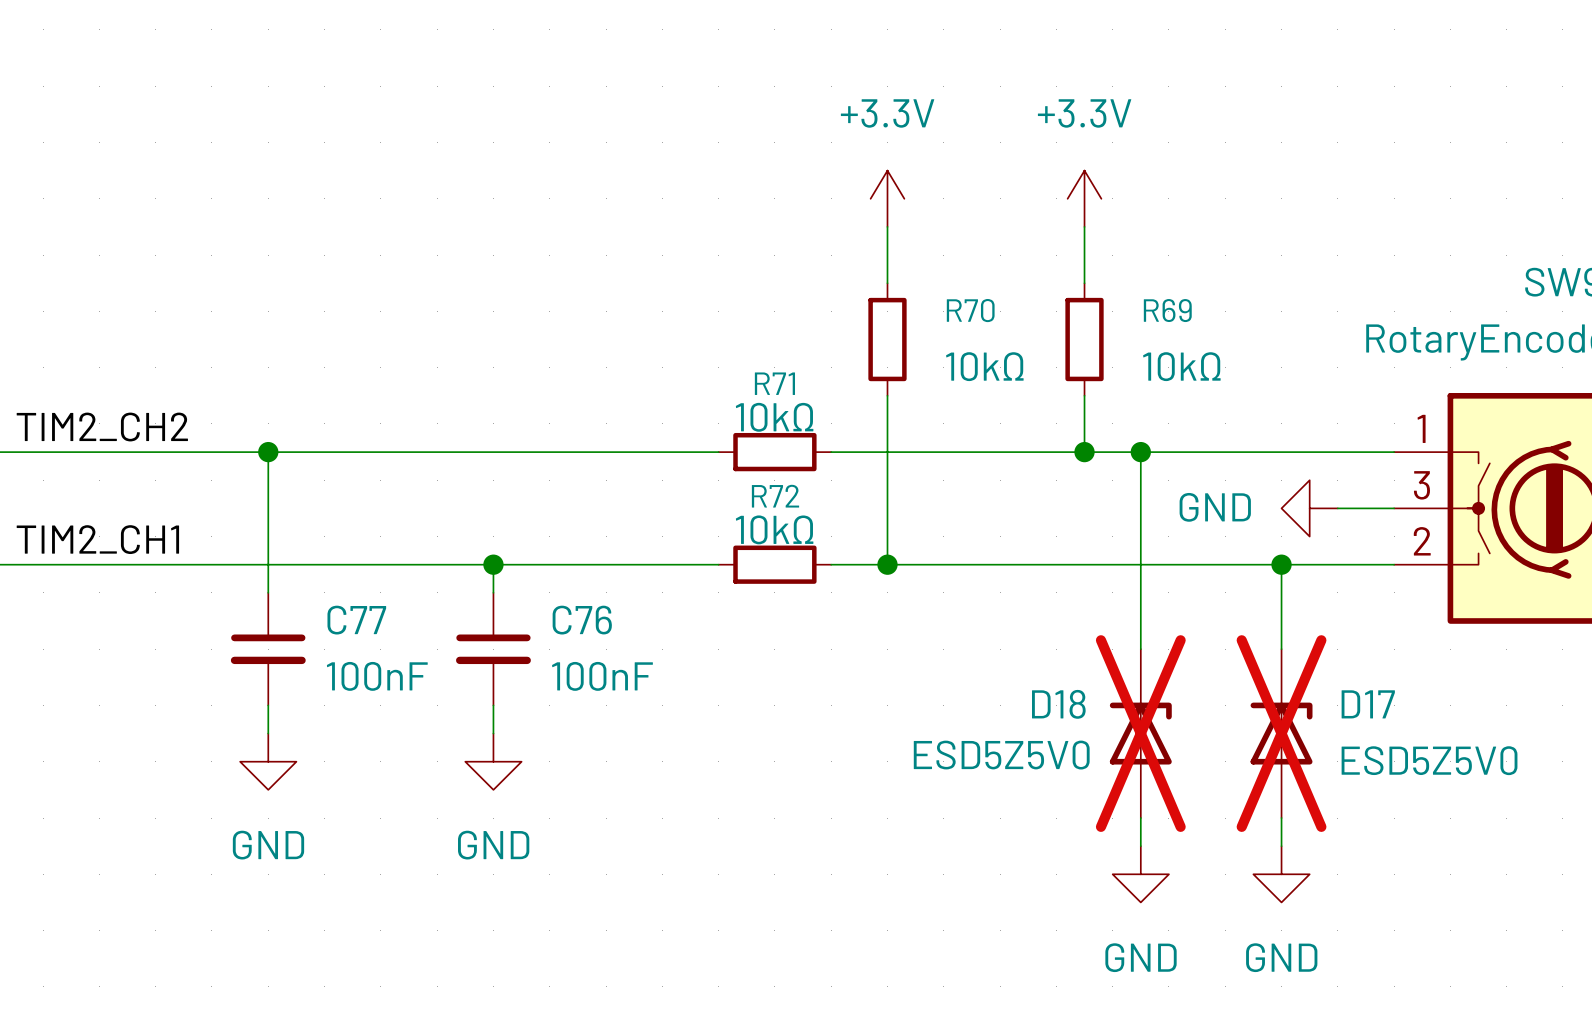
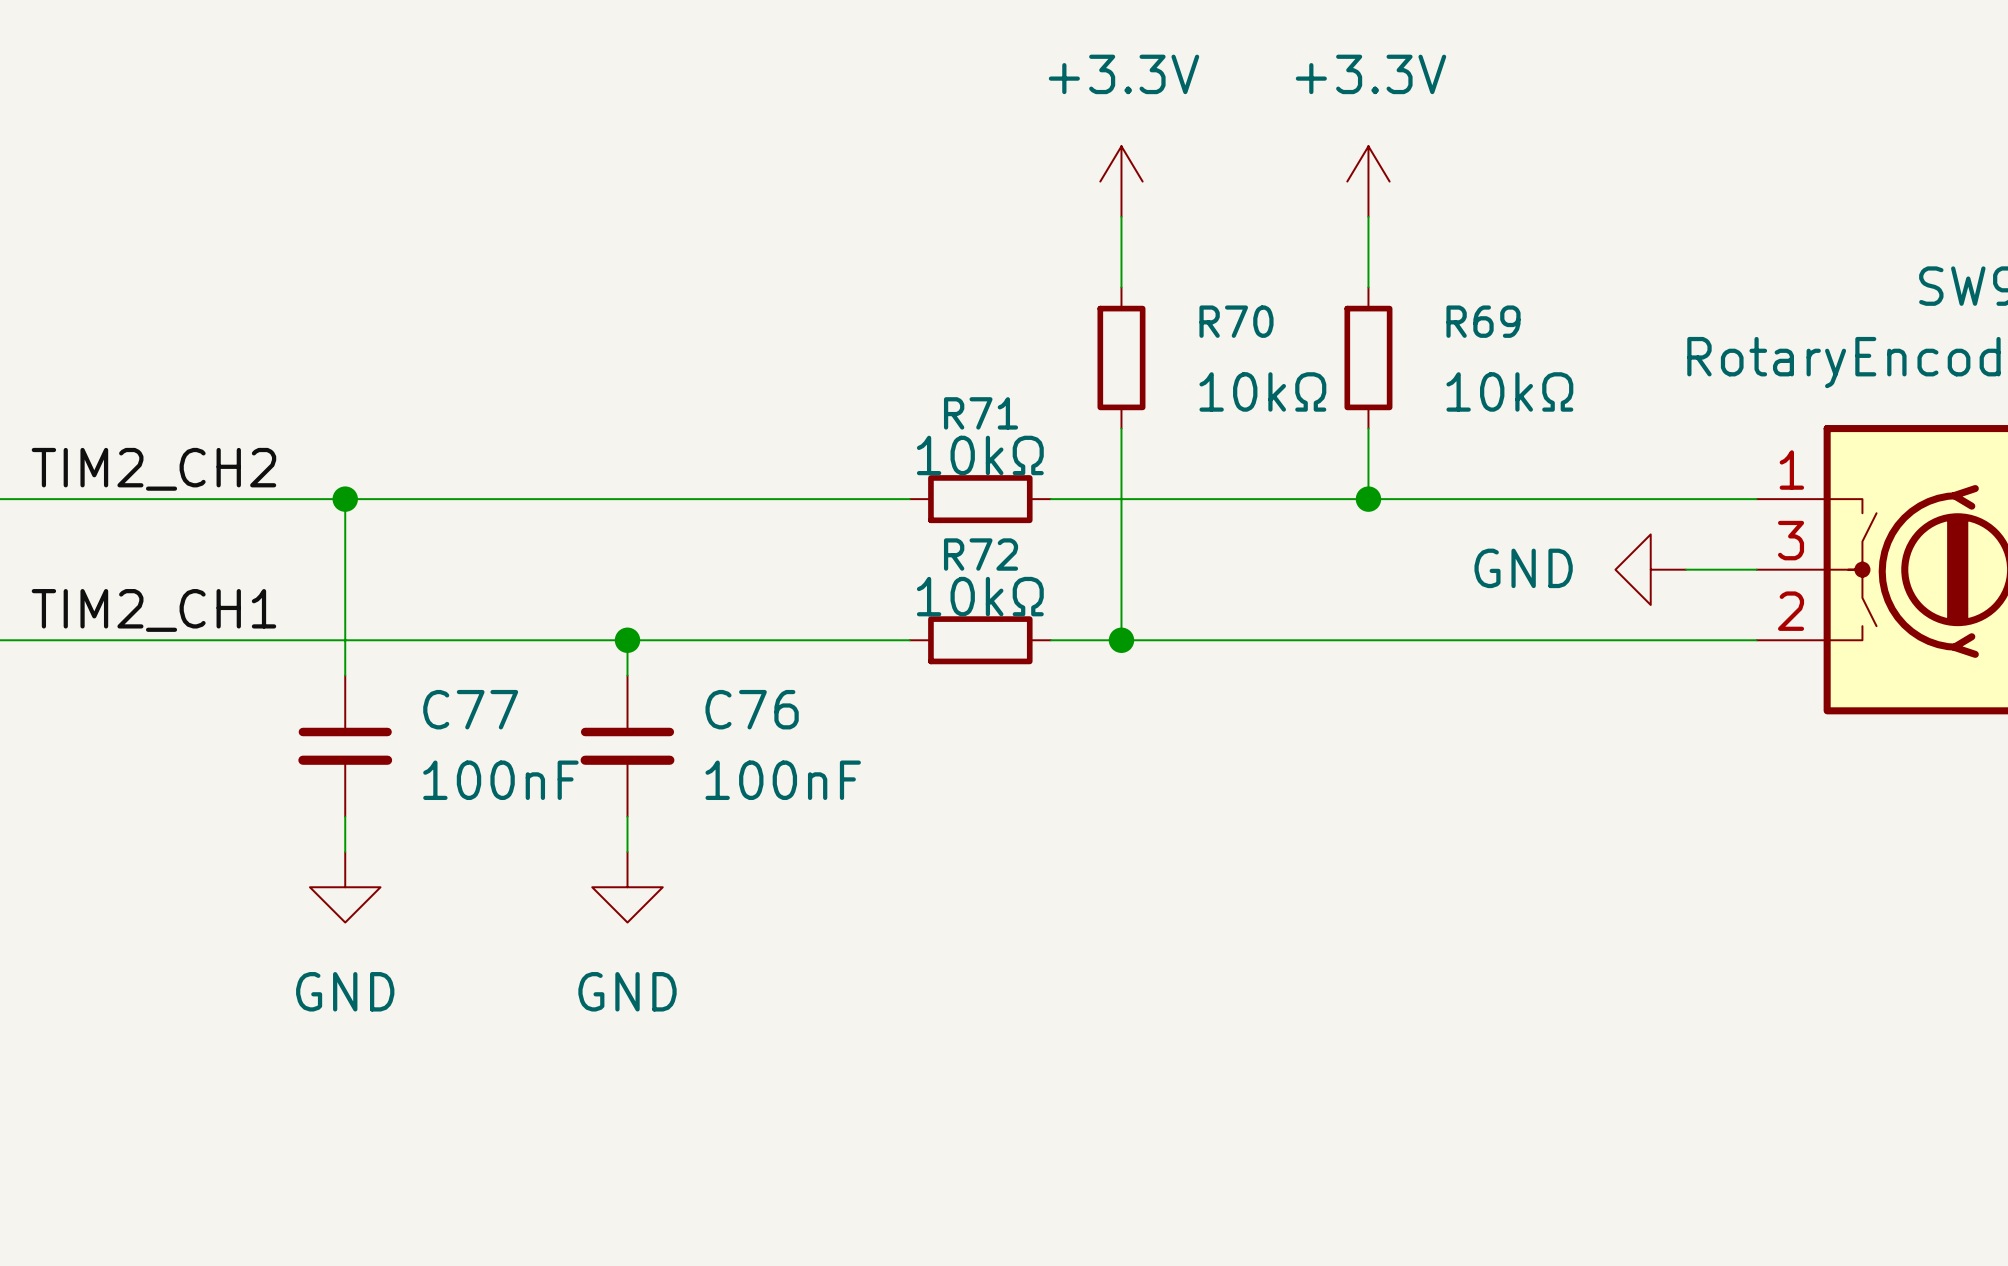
wire: (1140, 452) (1140, 649) -> none
junction: (1140, 452) -> none
wire: (1281, 564) (1281, 649) -> none
junction: (1281, 564) -> none
D18: ESD5Z5V0 (1140, 733) -> none
D17: ESD5Z5V0 (1281, 733) -> none
wire: (1140, 818) (1140, 846) -> none
wire: (1281, 818) (1281, 846) -> none
power symbol: GND (1140, 874) -> none
power symbol: GND (1281, 874) -> none

